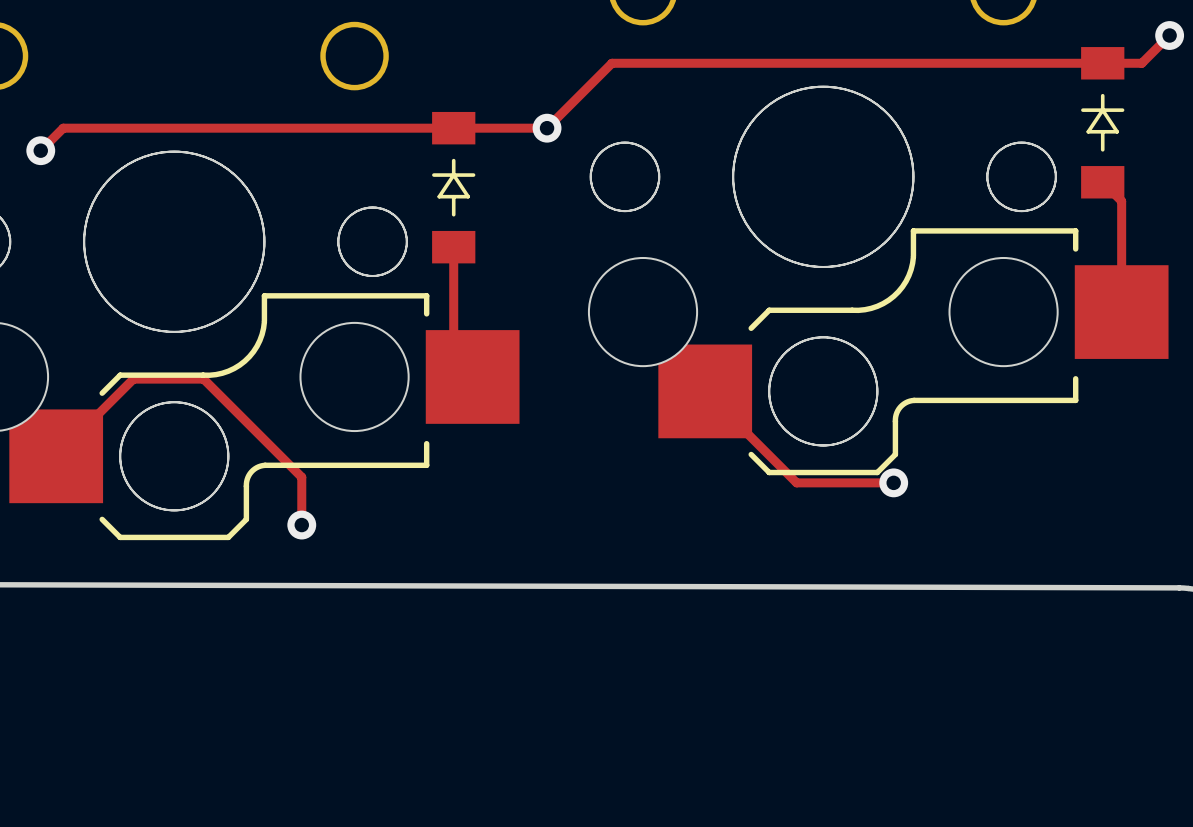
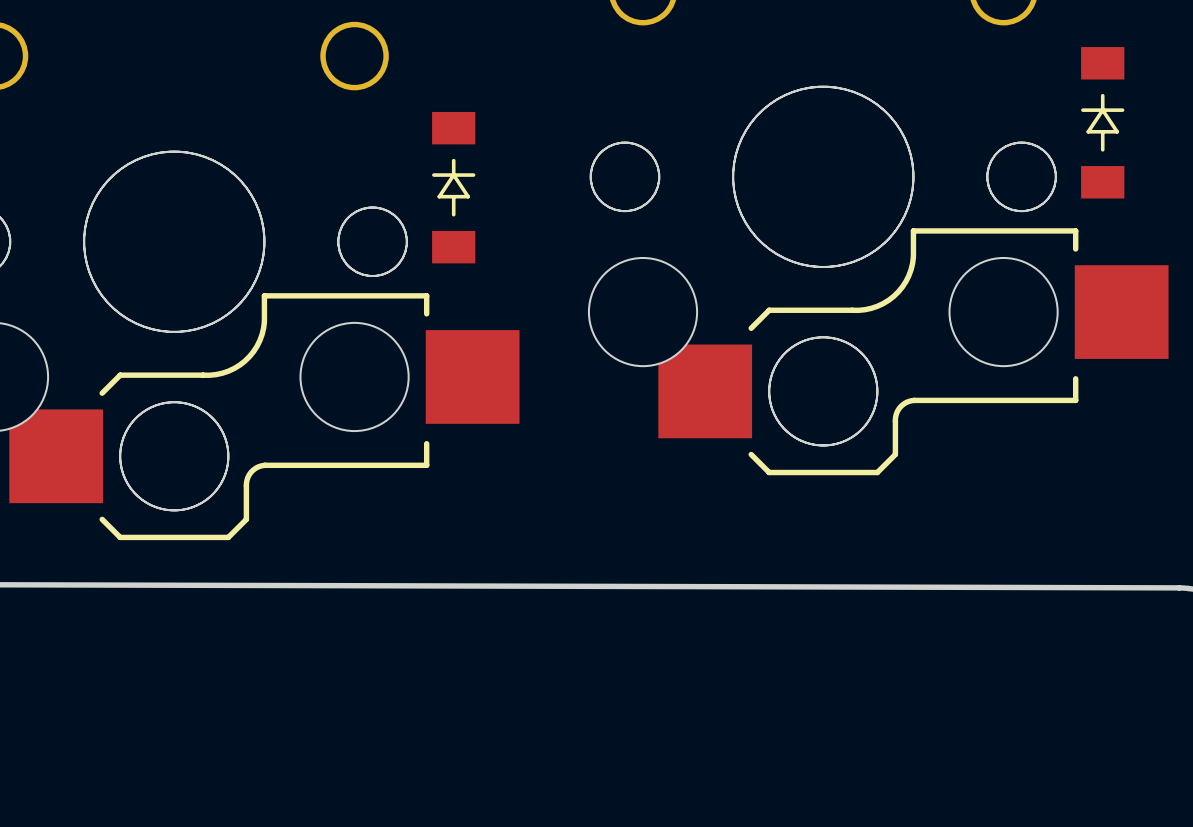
track: (1169, 35) (1141, 63) (611, 63) (547, 128) (63, 128) (40, 150) -> none
via: (1169, 35) -> none
via: (547, 128) -> none
via: (40, 150) -> none
track: (1102, 182) (1121, 201) (1121, 312) -> none
track: (453, 247) (453, 358) (472, 376) -> none
track: (705, 391) (796, 482) (893, 482) -> none
track: (56, 456) (133, 379) (203, 379) (301, 477) (301, 525) -> none
via: (893, 482) -> none
via: (301, 525) -> none

